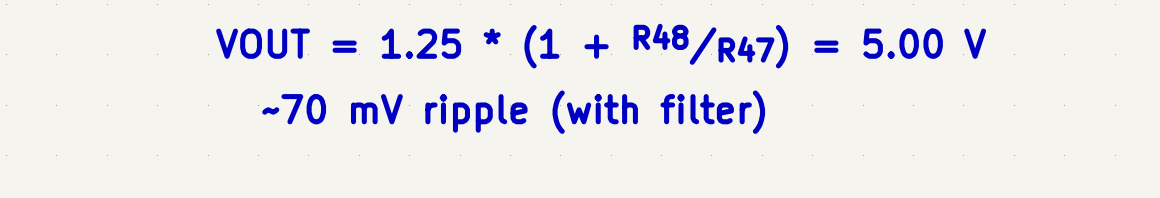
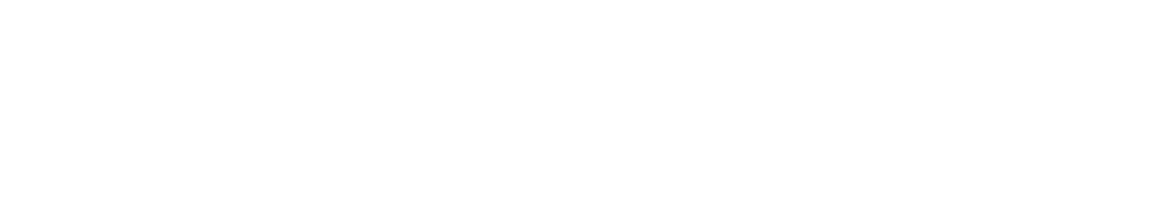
text: VOUT = 1.25 * (1 + R48/R47) = 5.00 V (601, 46) -> none
text: ~70 mV ripple (with filter) (513, 112) -> none

